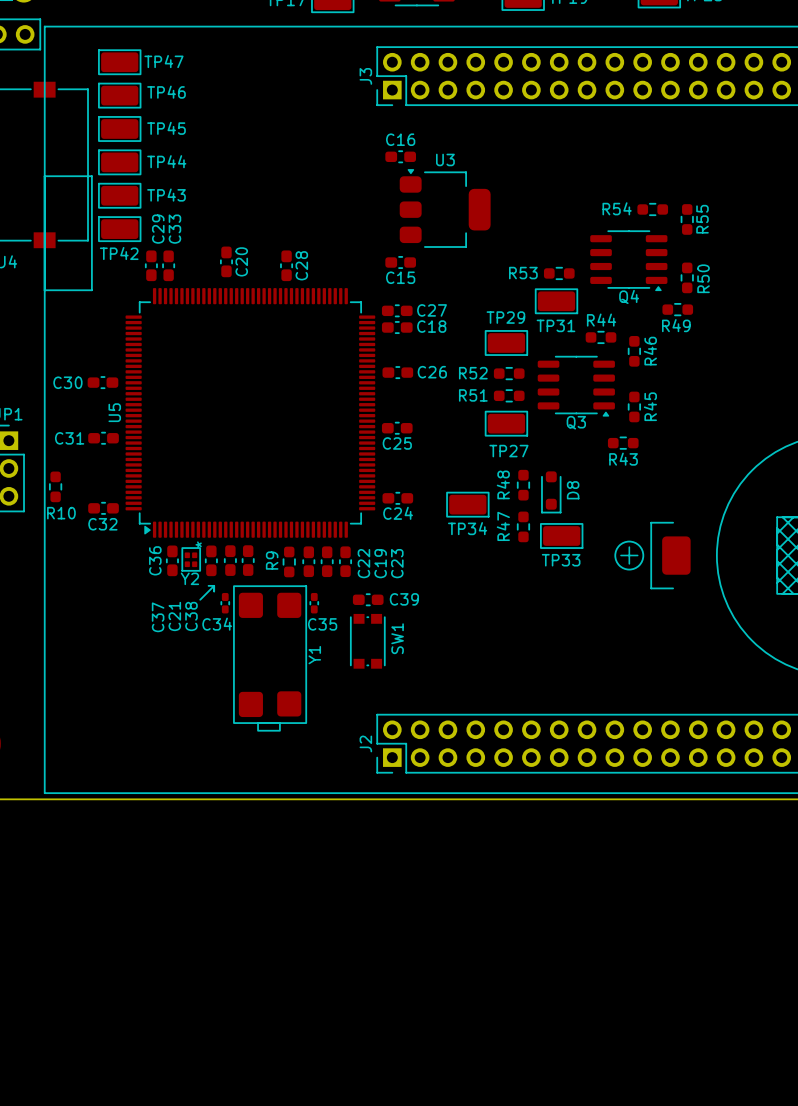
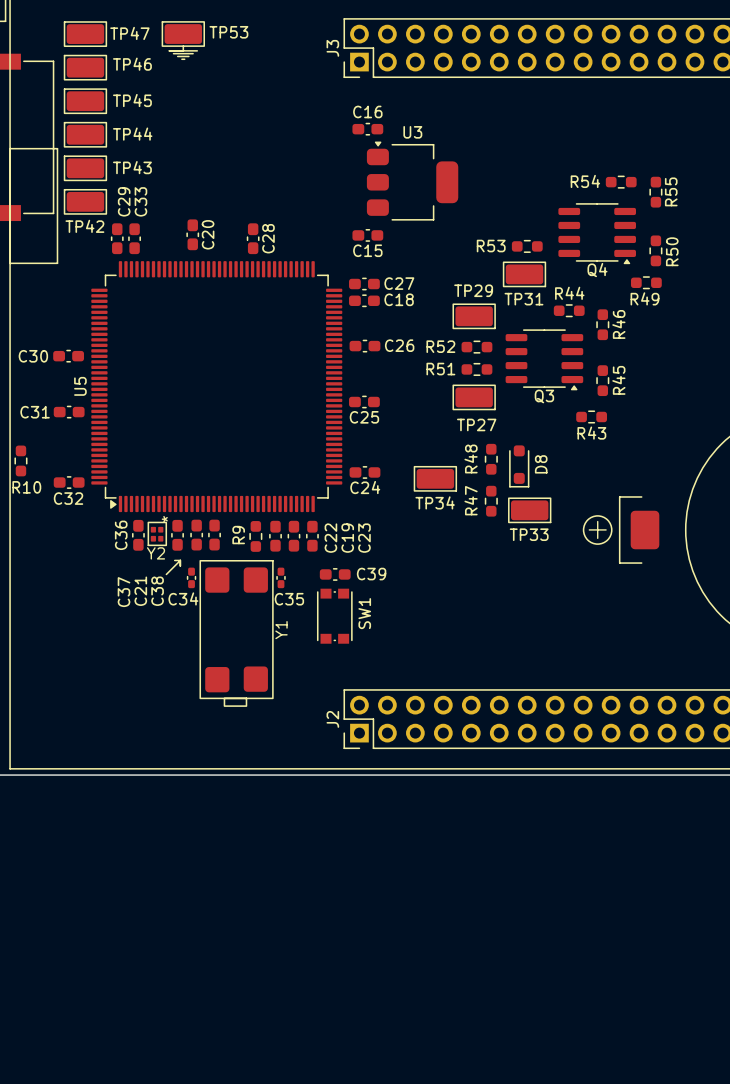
TP53: none -> (183, 34)
line: none -> (183, 46) (183, 50)
line: none -> (169, 50) (197, 50)
line: none -> (173, 53) (193, 53)
line: none -> (177, 56) (188, 56)
line: none -> (181, 59) (184, 59)

